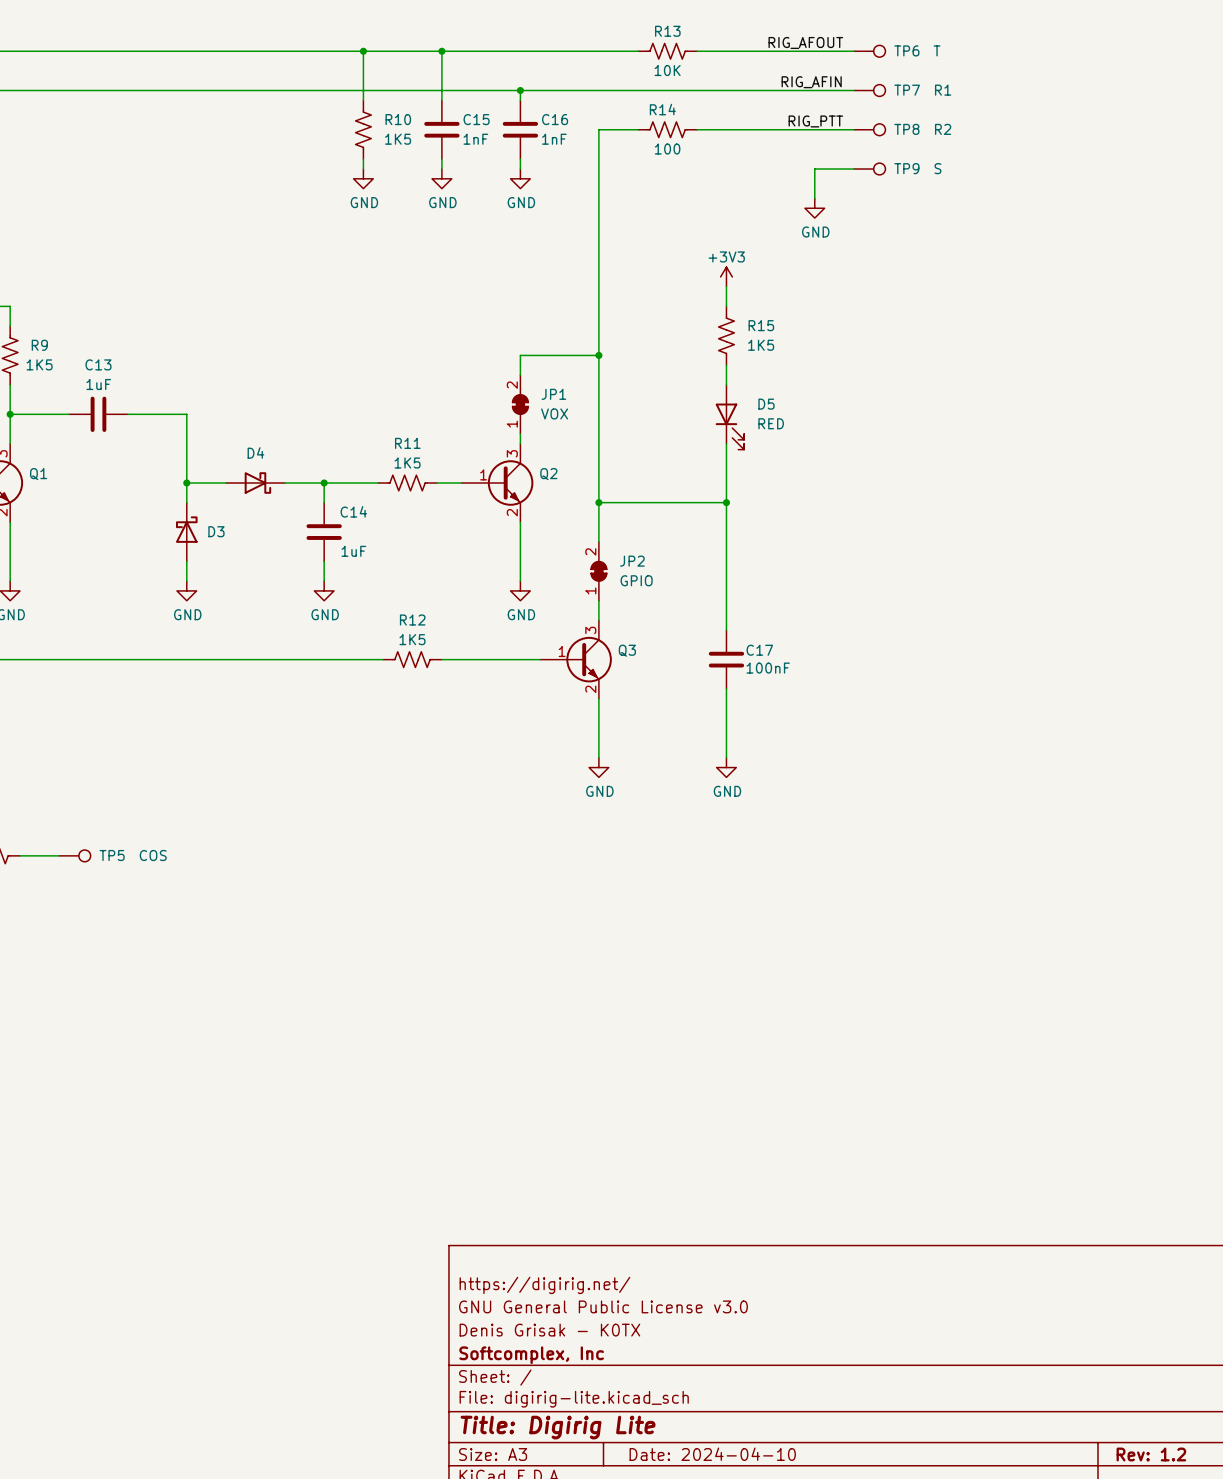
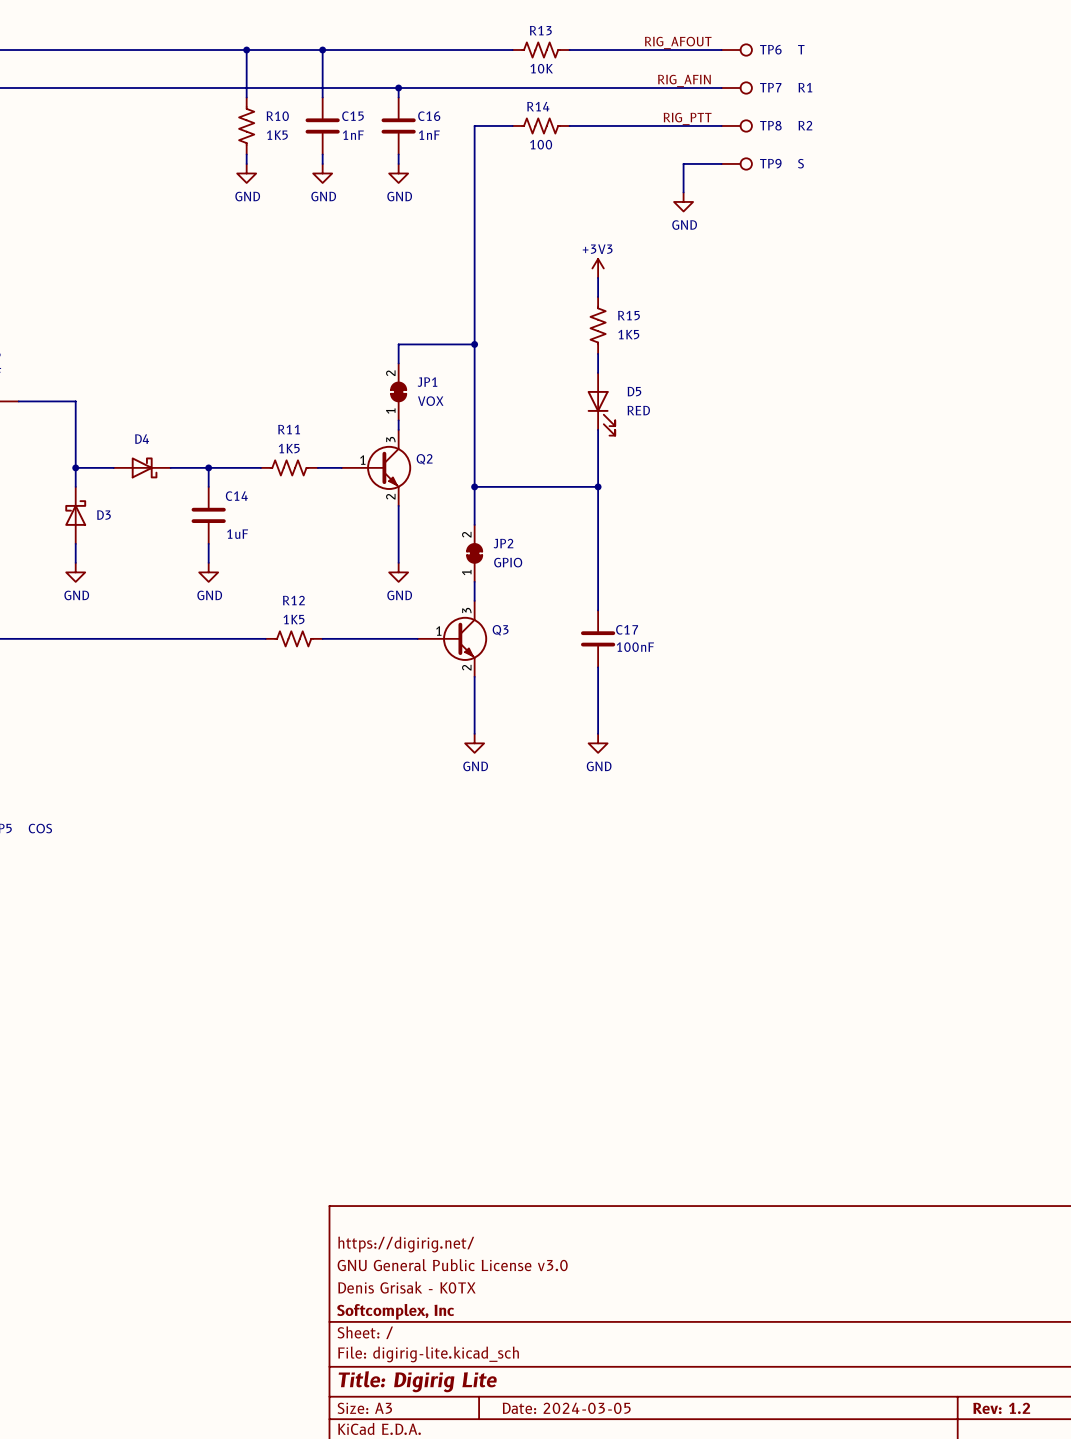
title block: Date: 2024-04-10 (712, 1454) -> Date: 2024-03-05 (566, 1408)

